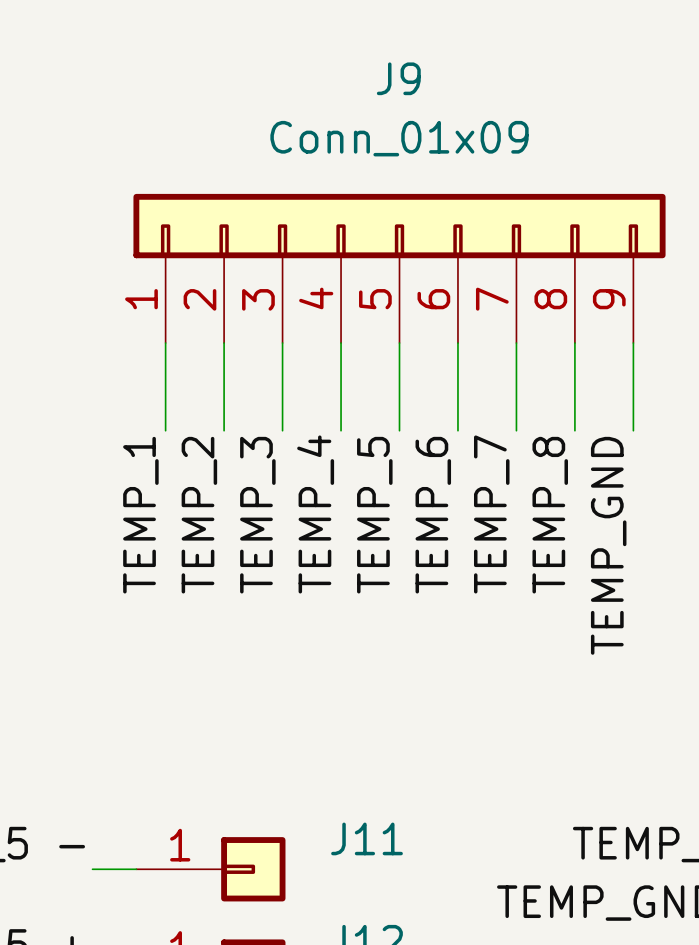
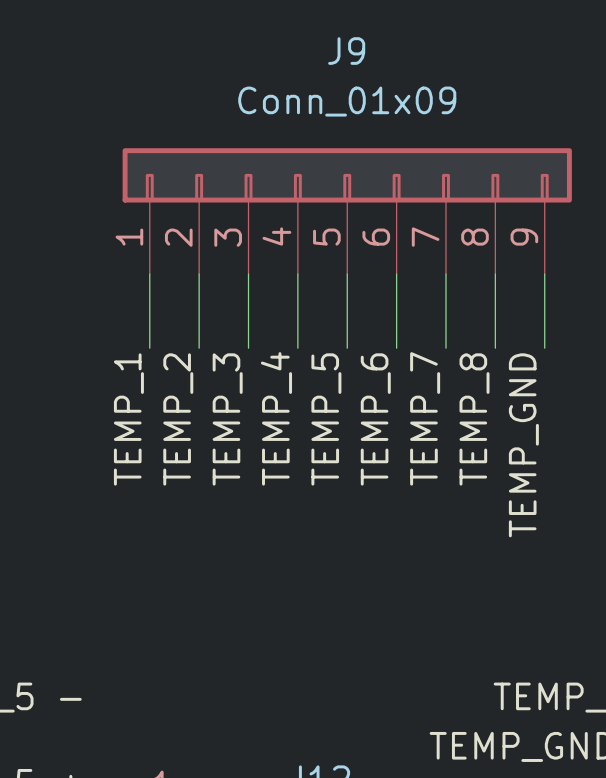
wire: (92, 869) (136, 869) -> none
J11: (210, 869) -> none

